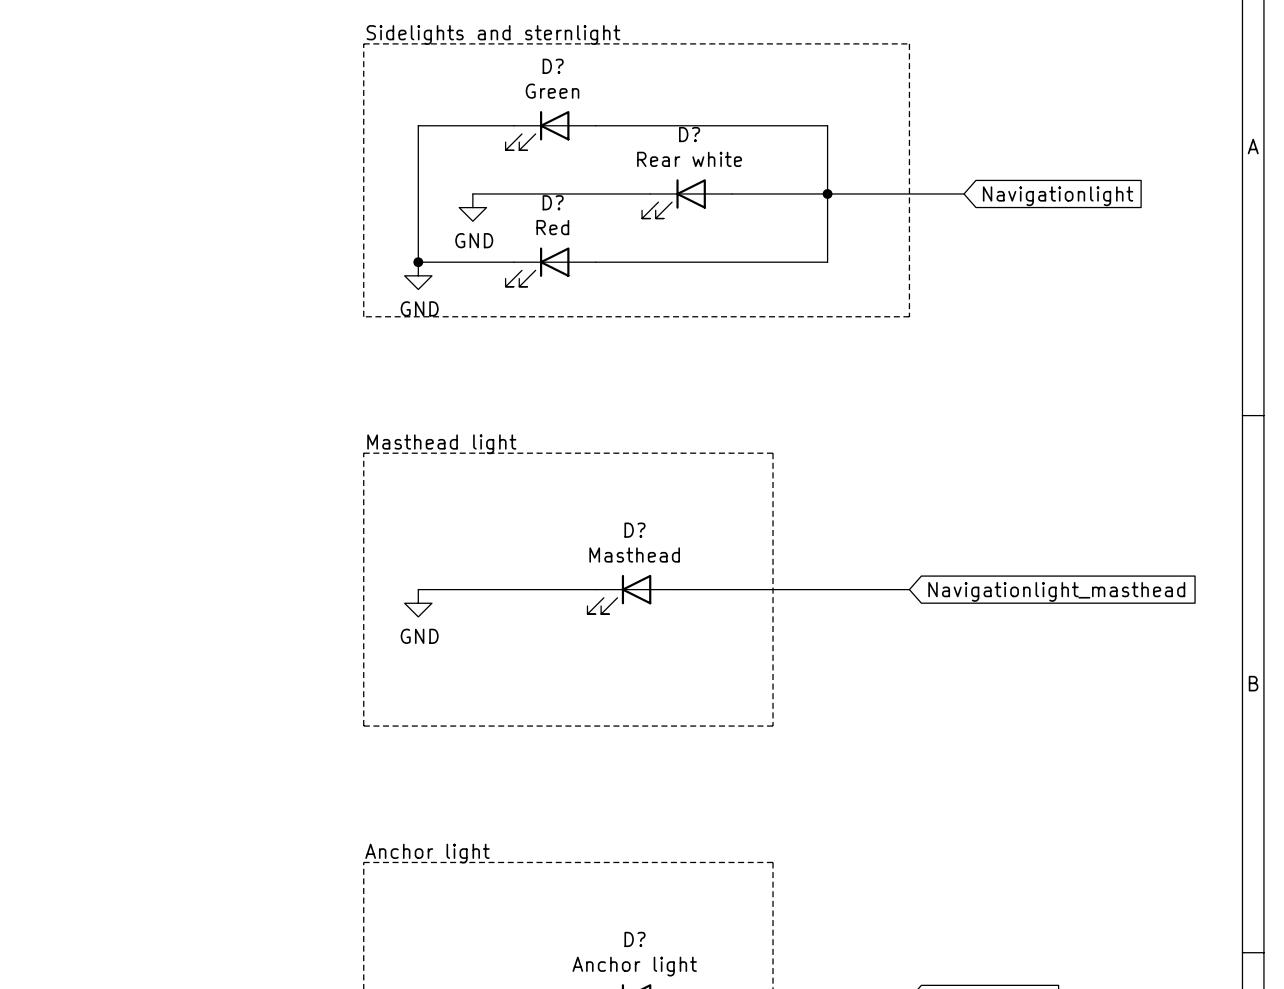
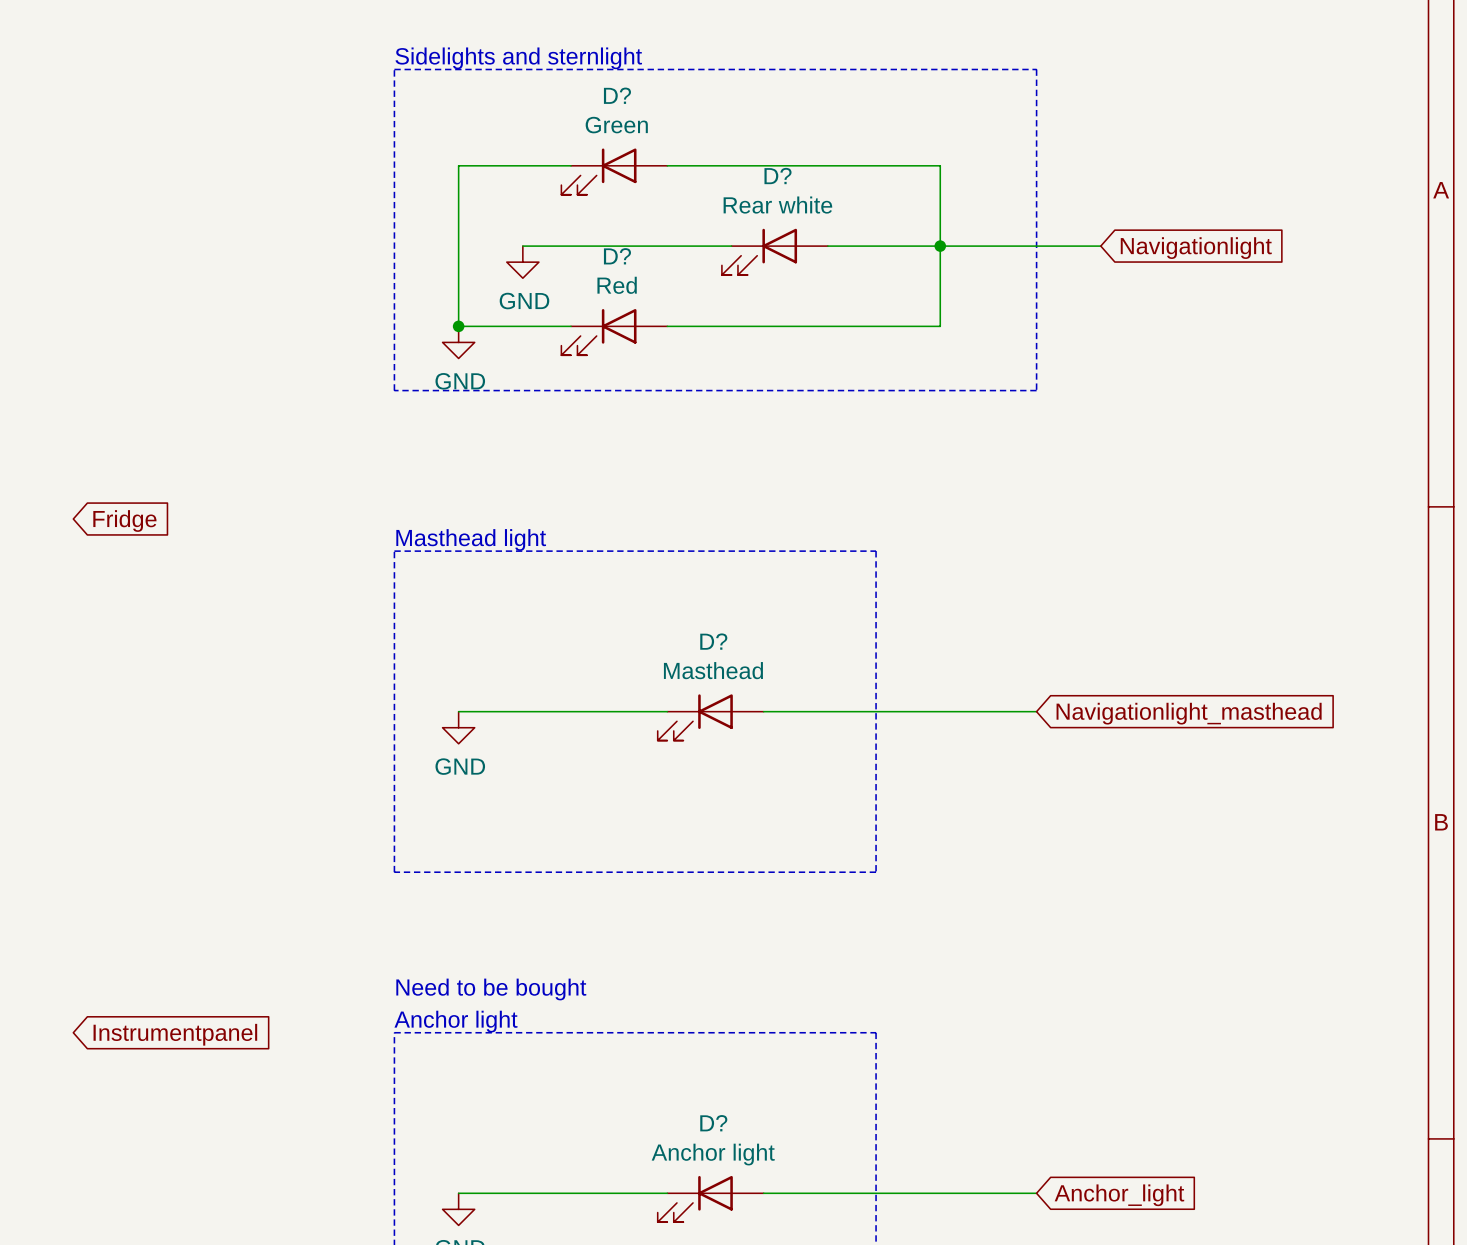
global label: none -> Fridge (124, 521)
text: none -> Need to be bought (491, 989)
global label: none -> Instrumentpanel (175, 1034)

